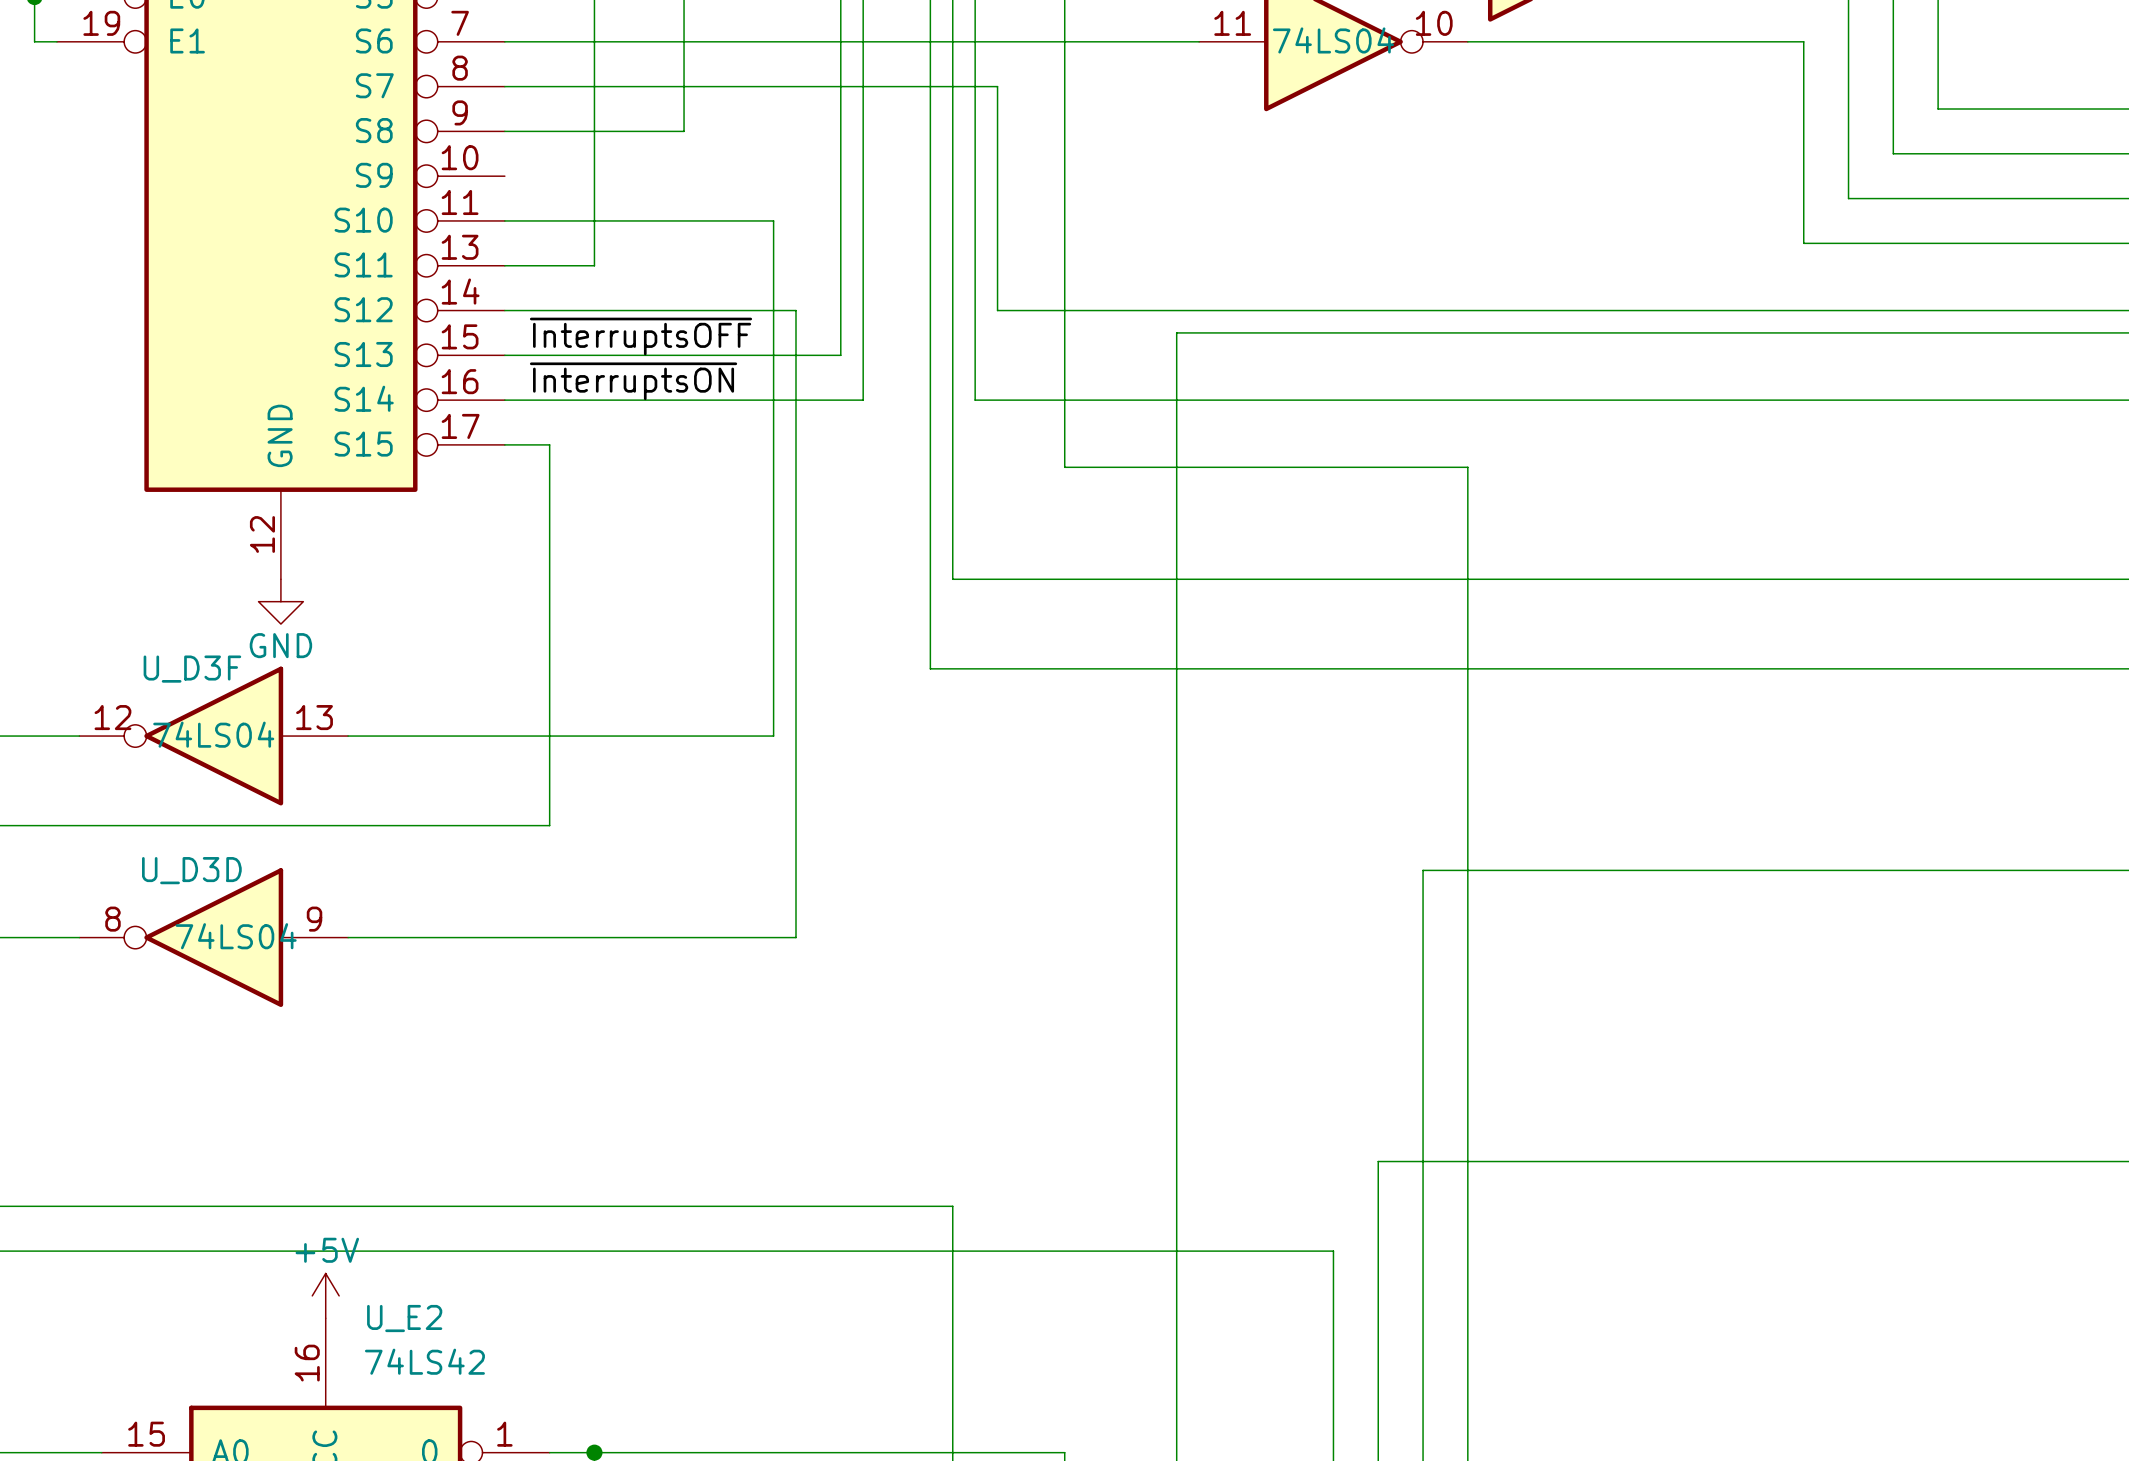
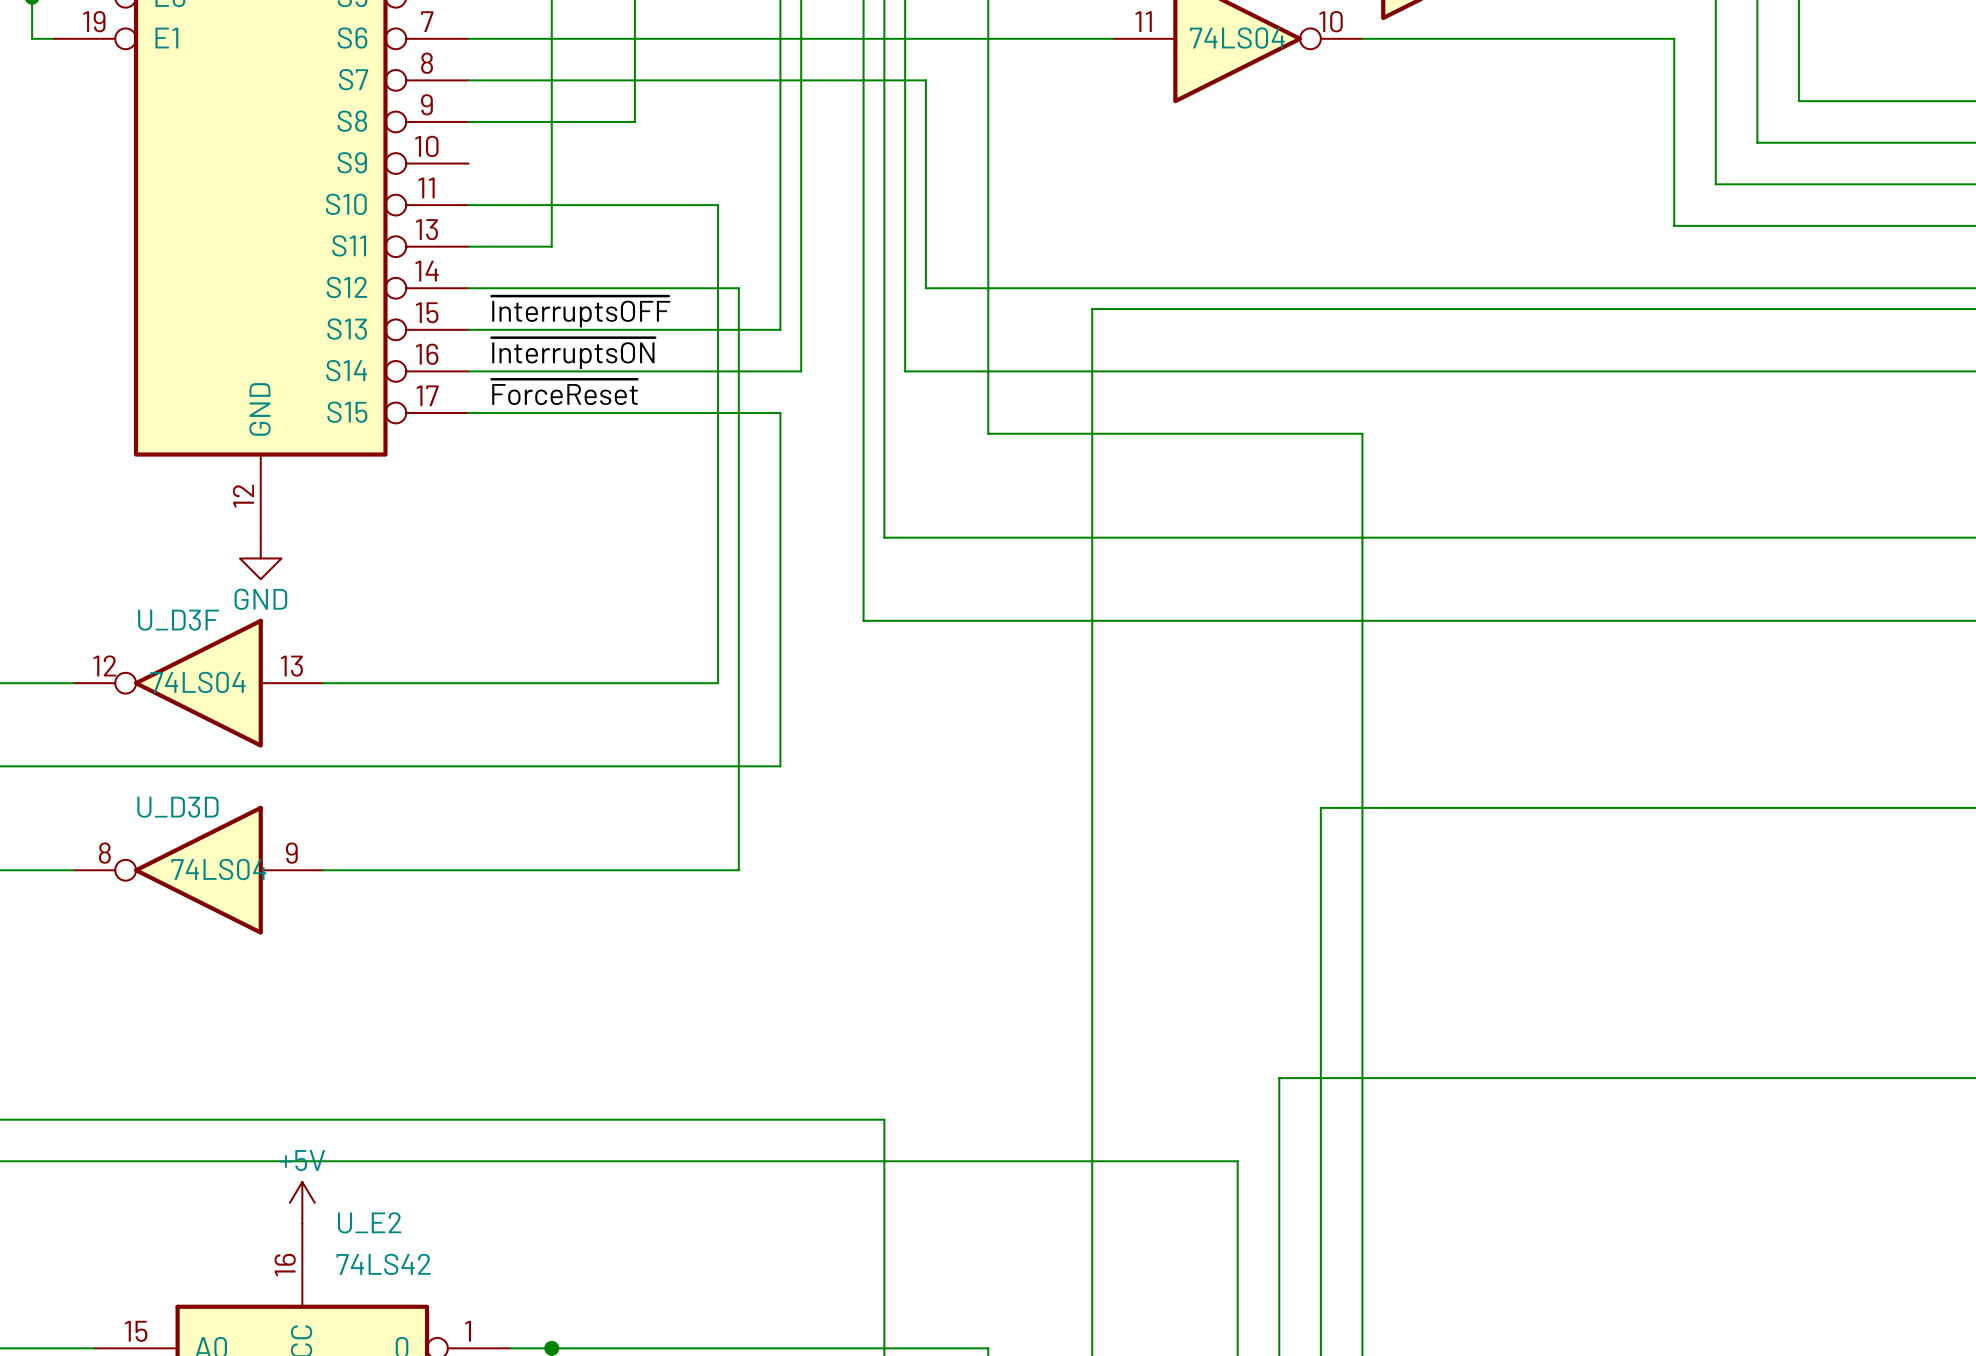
label: none -> ~{ForceReset} (564, 392)
wire: (549, 444) (549, 825) -> (510, 412) (780, 412) (780, 766) (510, 766)

